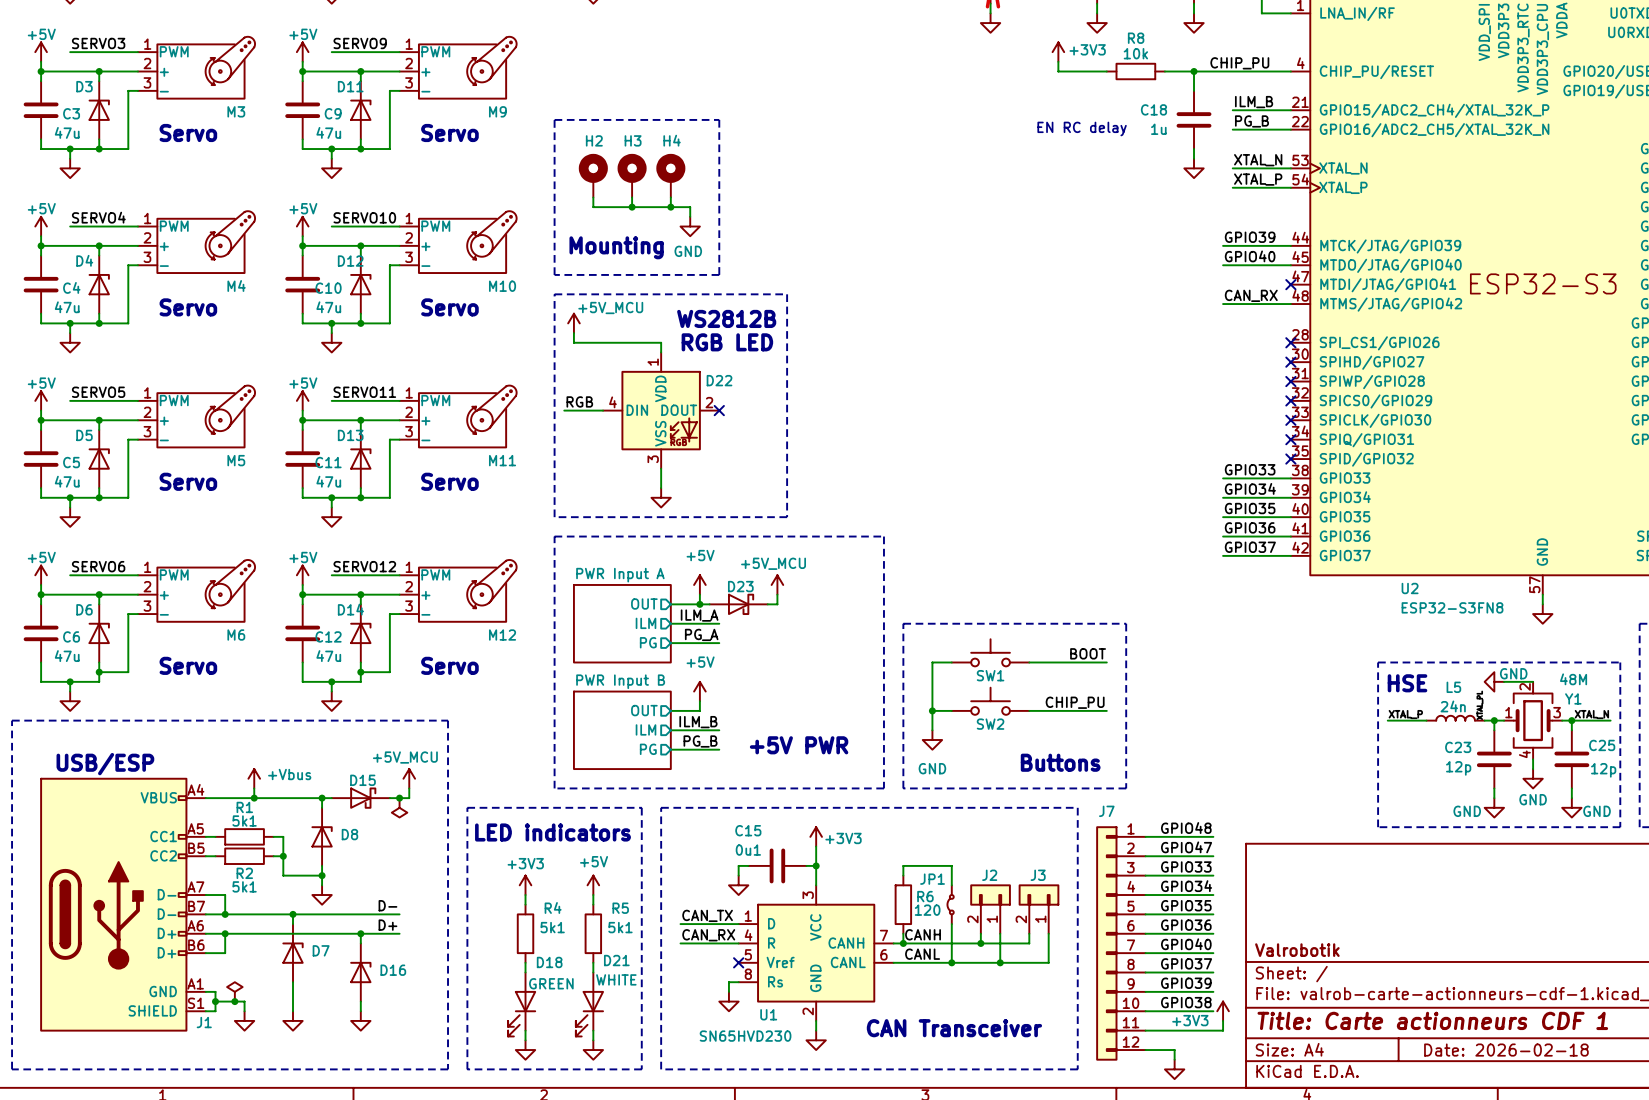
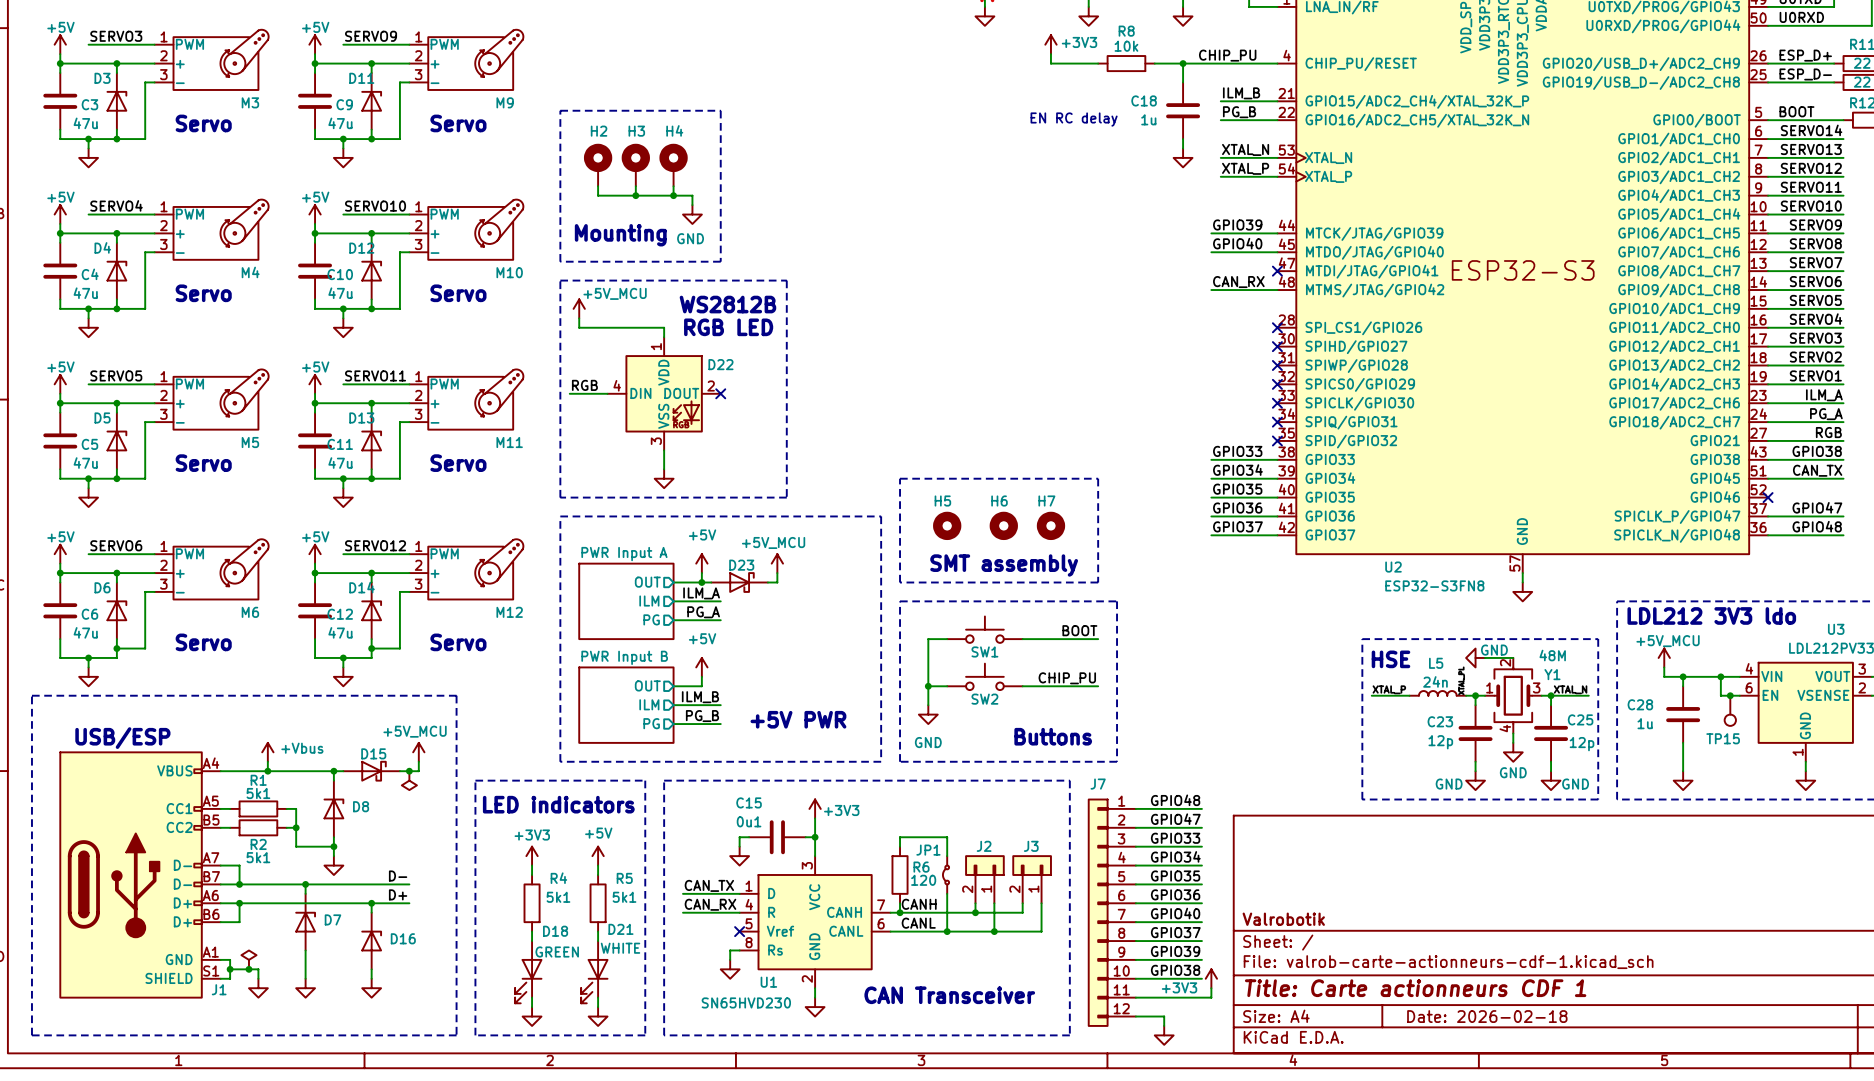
line: none -> (900, 478) (1098, 478) (1098, 582) (900, 582) (900, 478)
H5: none -> (947, 525)
H6: none -> (1003, 525)
H7: none -> (1050, 525)
text: none -> SMT assembly (1004, 565)

